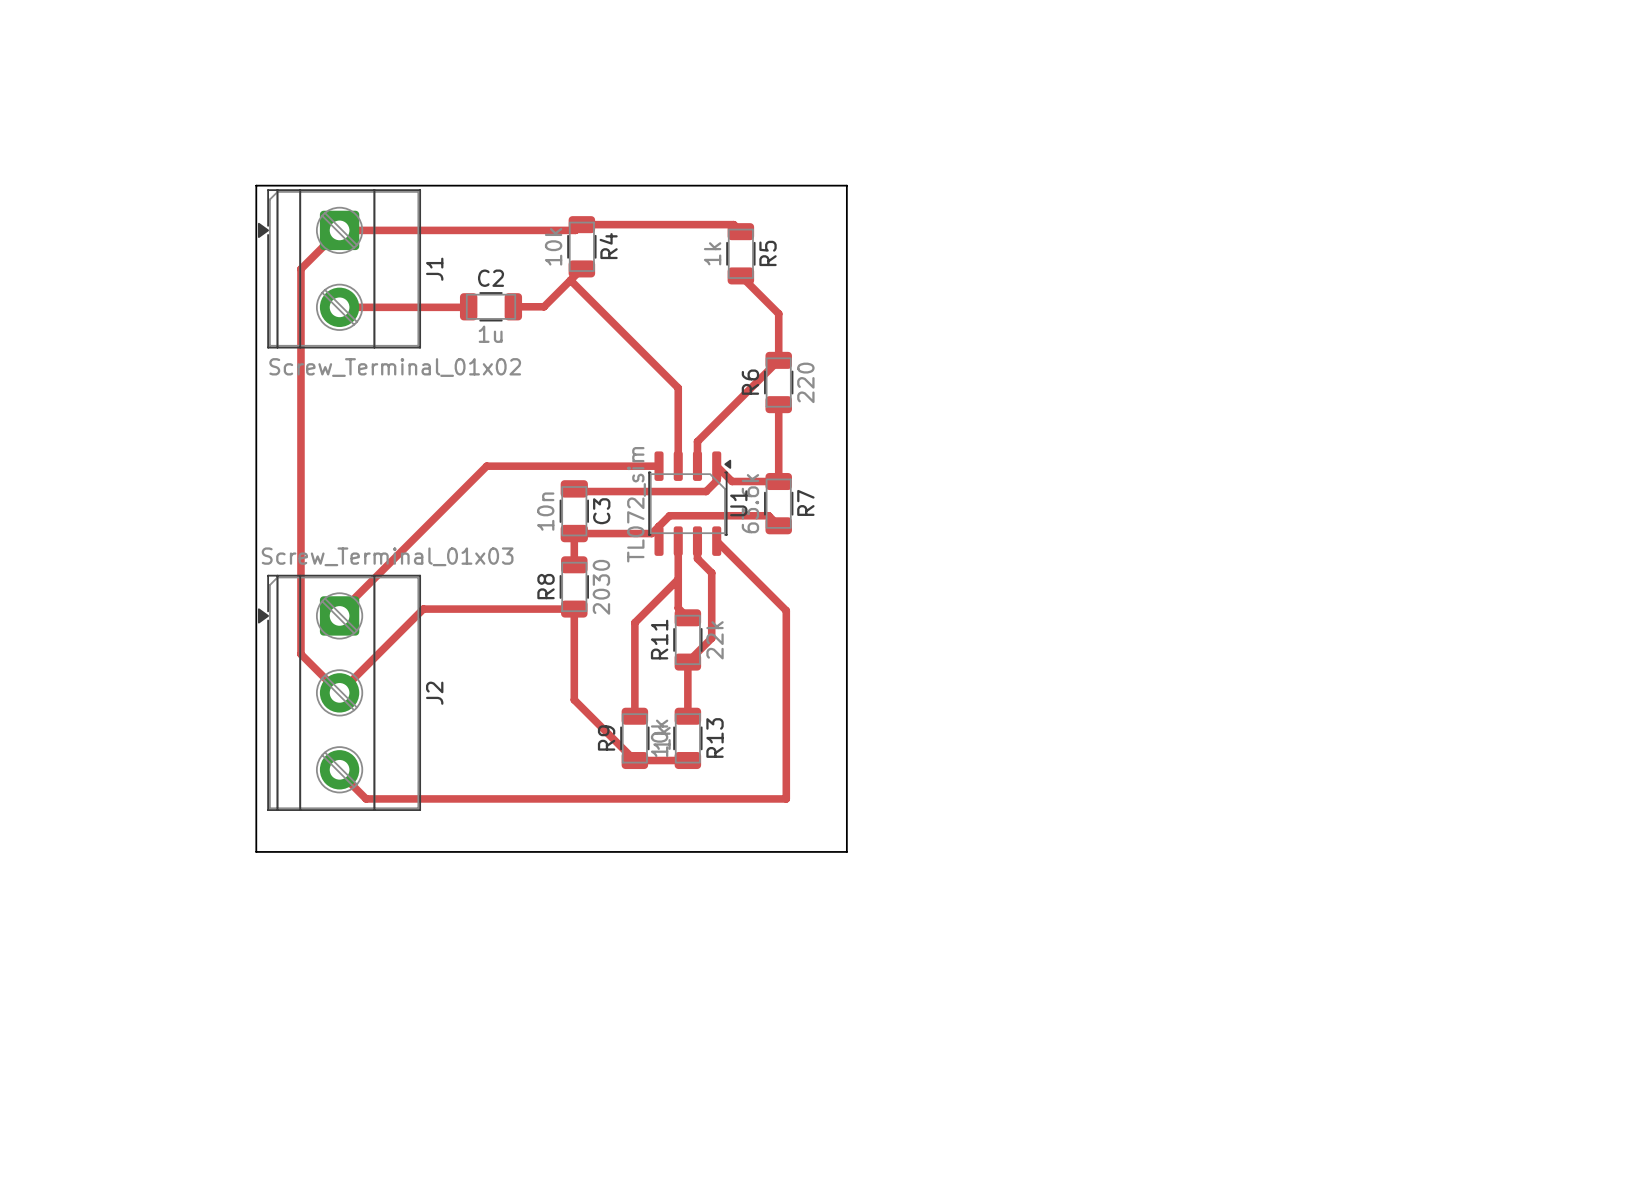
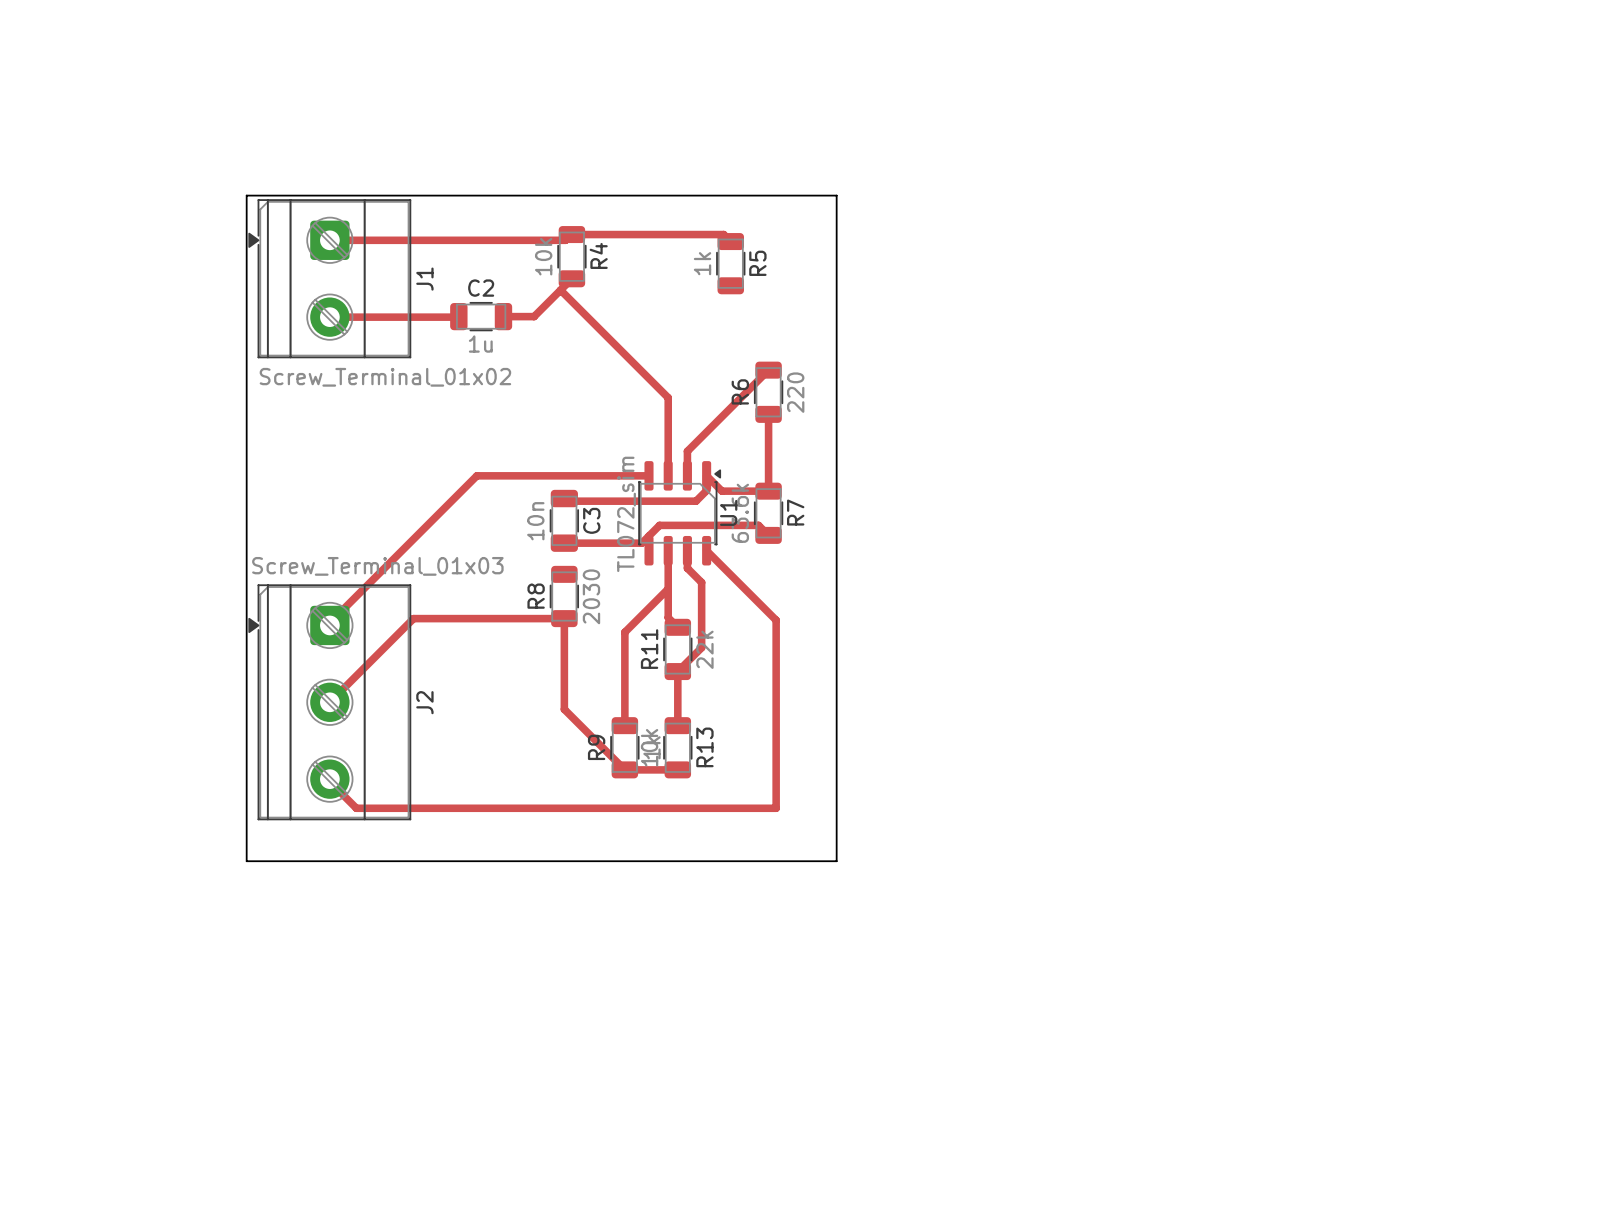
track: (339, 230) (300, 269) (300, 654) (339, 692) -> none
track: (740, 275) (778, 313) (778, 360) -> none
track: (574, 533) (574, 564) -> none

